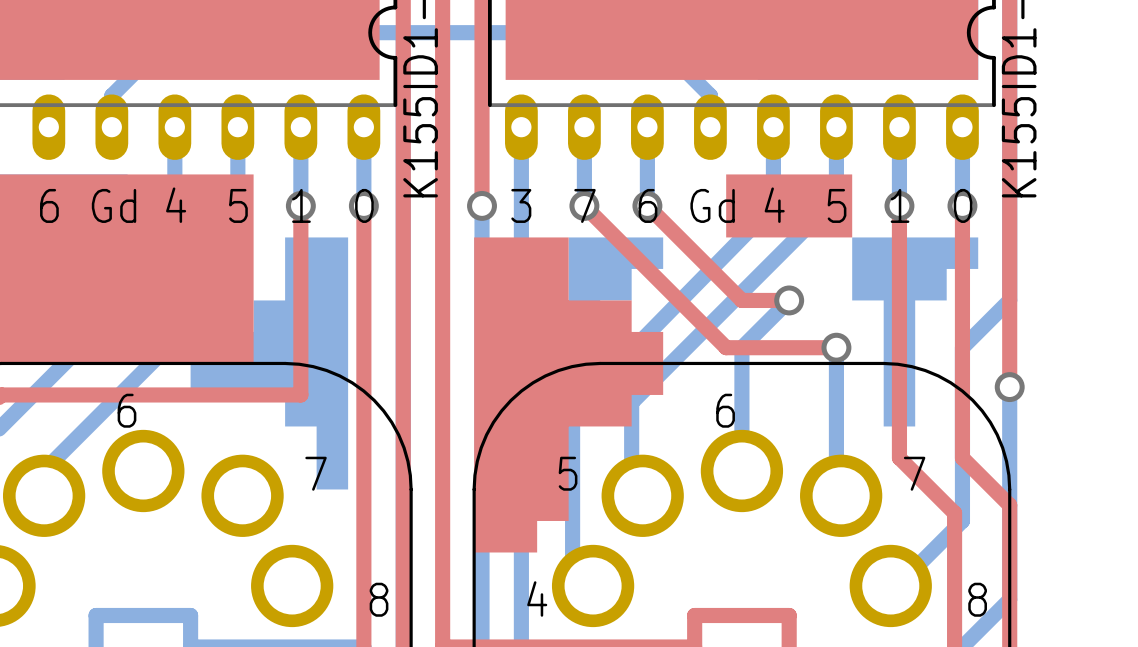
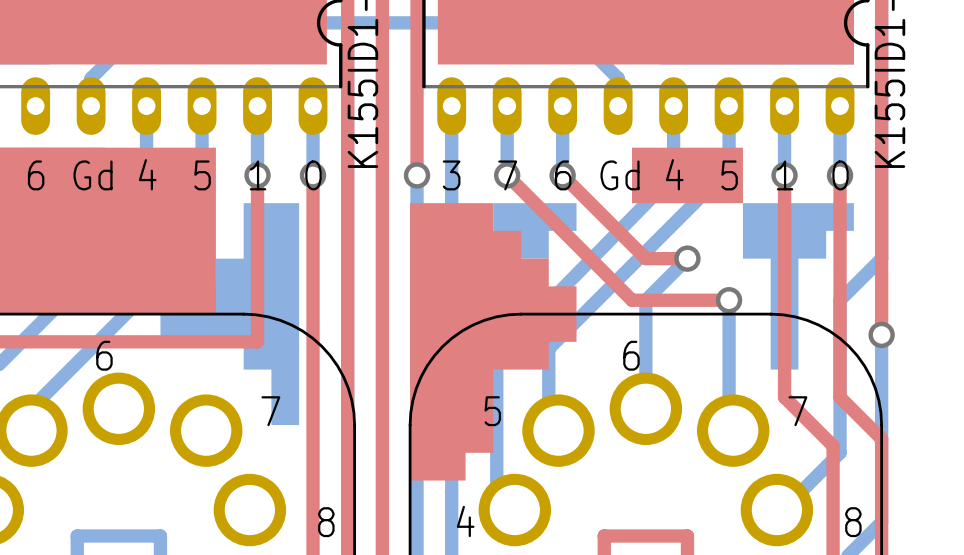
drawing: none -> [493, 230, 522, 259]

